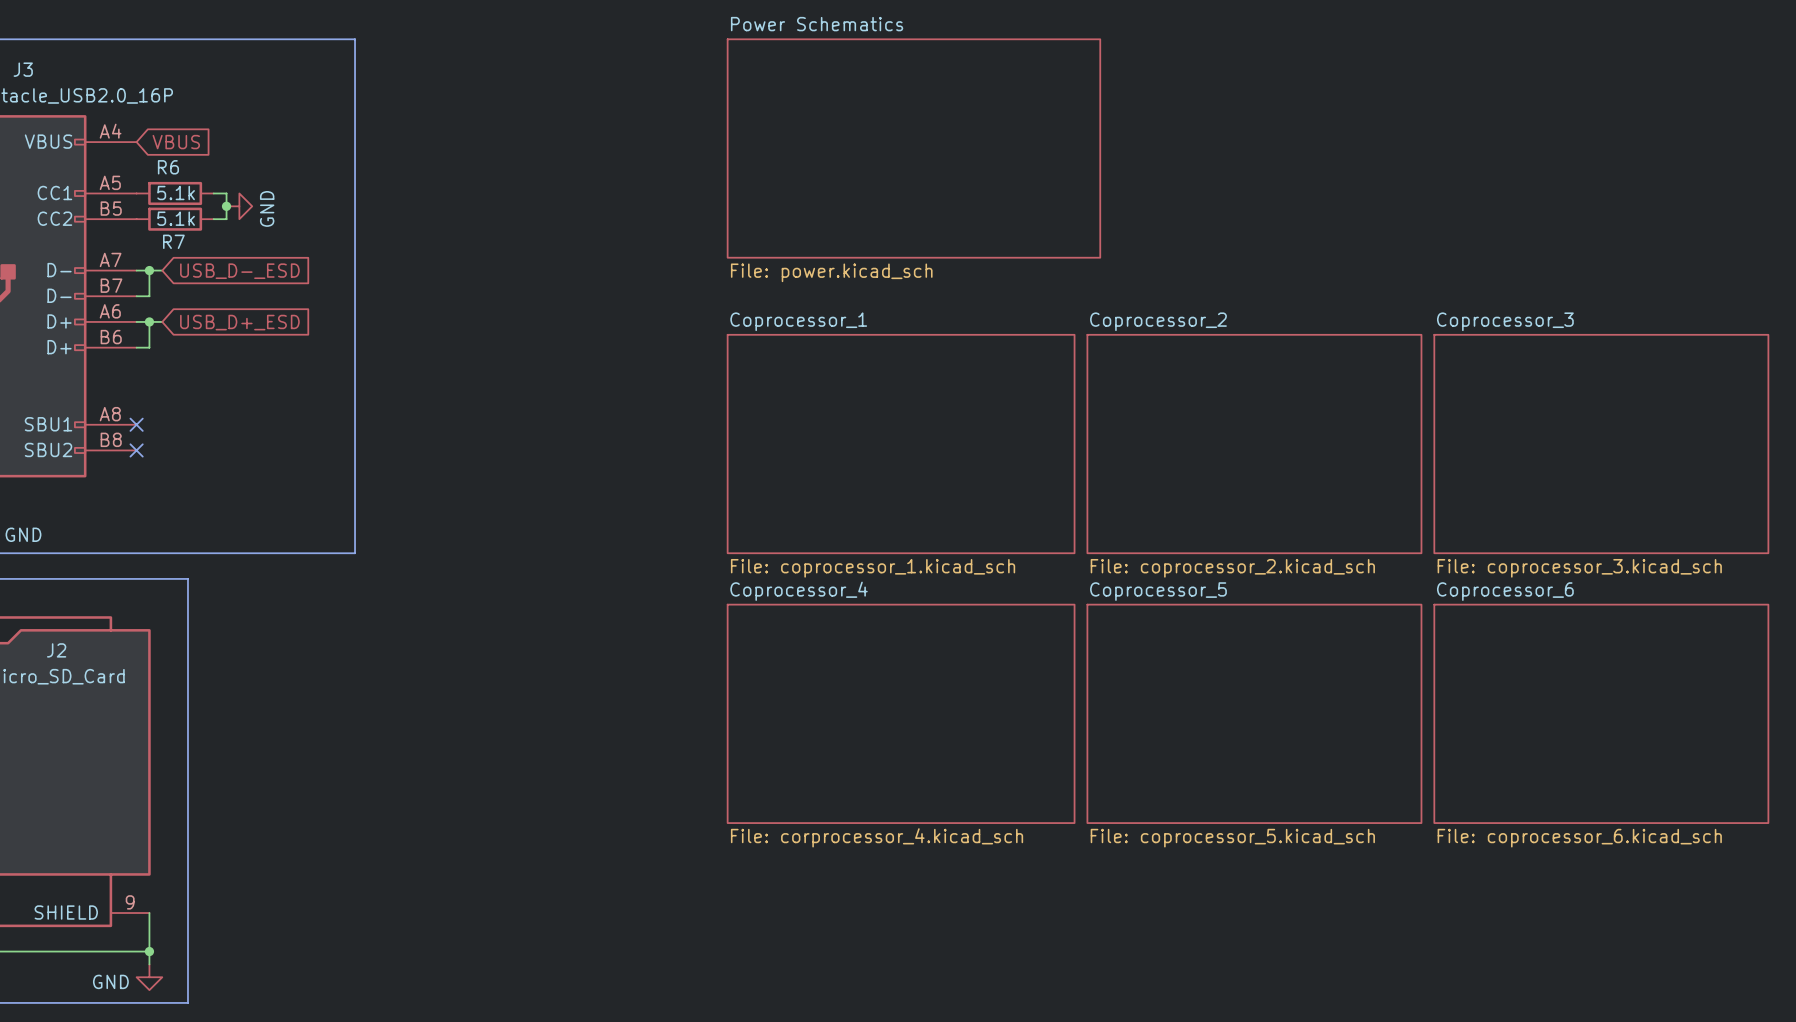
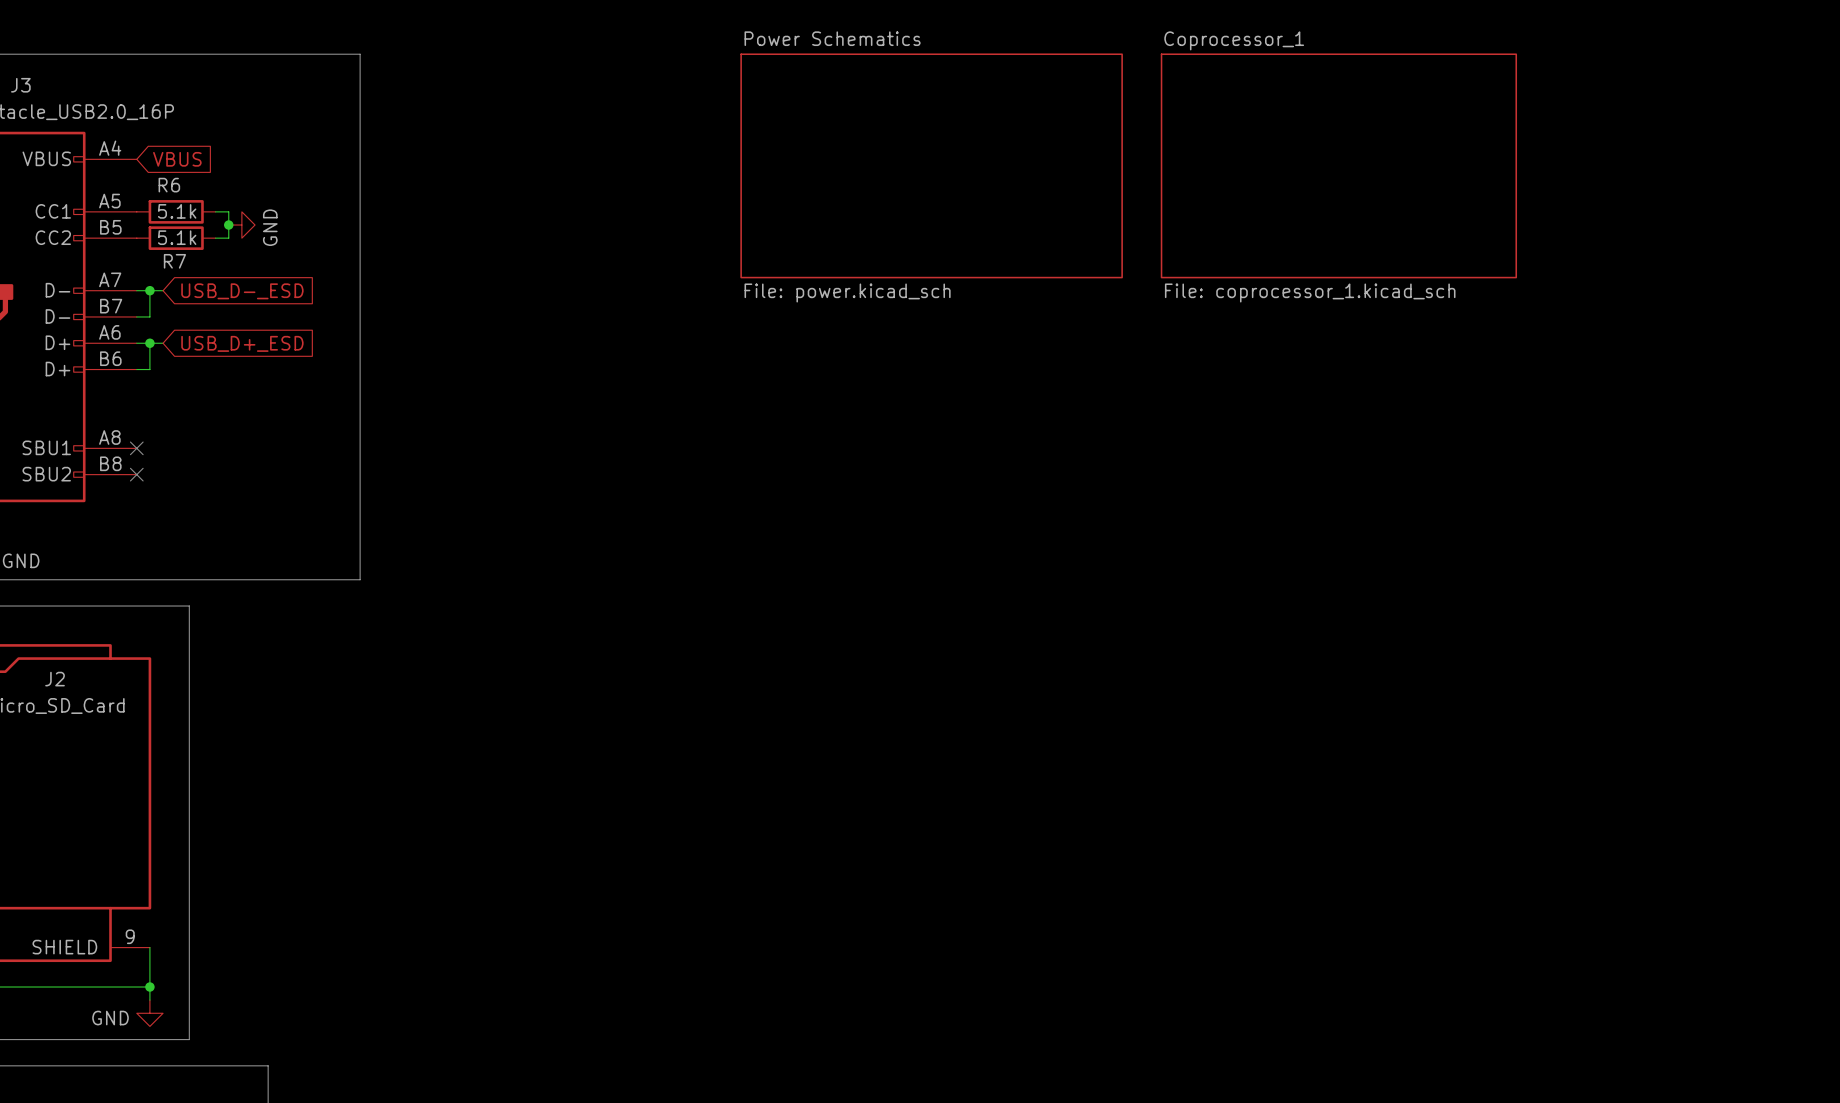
sheet Coprocessor_1 position: (901, 444) -> (1338, 165)
sheet Coprocessor_2: File: coprocessor_2.kicad_sch (1254, 444) -> none
sheet Coprocessor_3: File: coprocessor_3.kicad_sch (1601, 444) -> none
sheet Coprocessor_4: File: corprocessor_4.kicad_sch (901, 713) -> none
sheet Coprocessor_5: File: coprocessor_5.kicad_sch (1254, 713) -> none
sheet Coprocessor_6: File: coprocessor_6.kicad_sch (1601, 713) -> none

